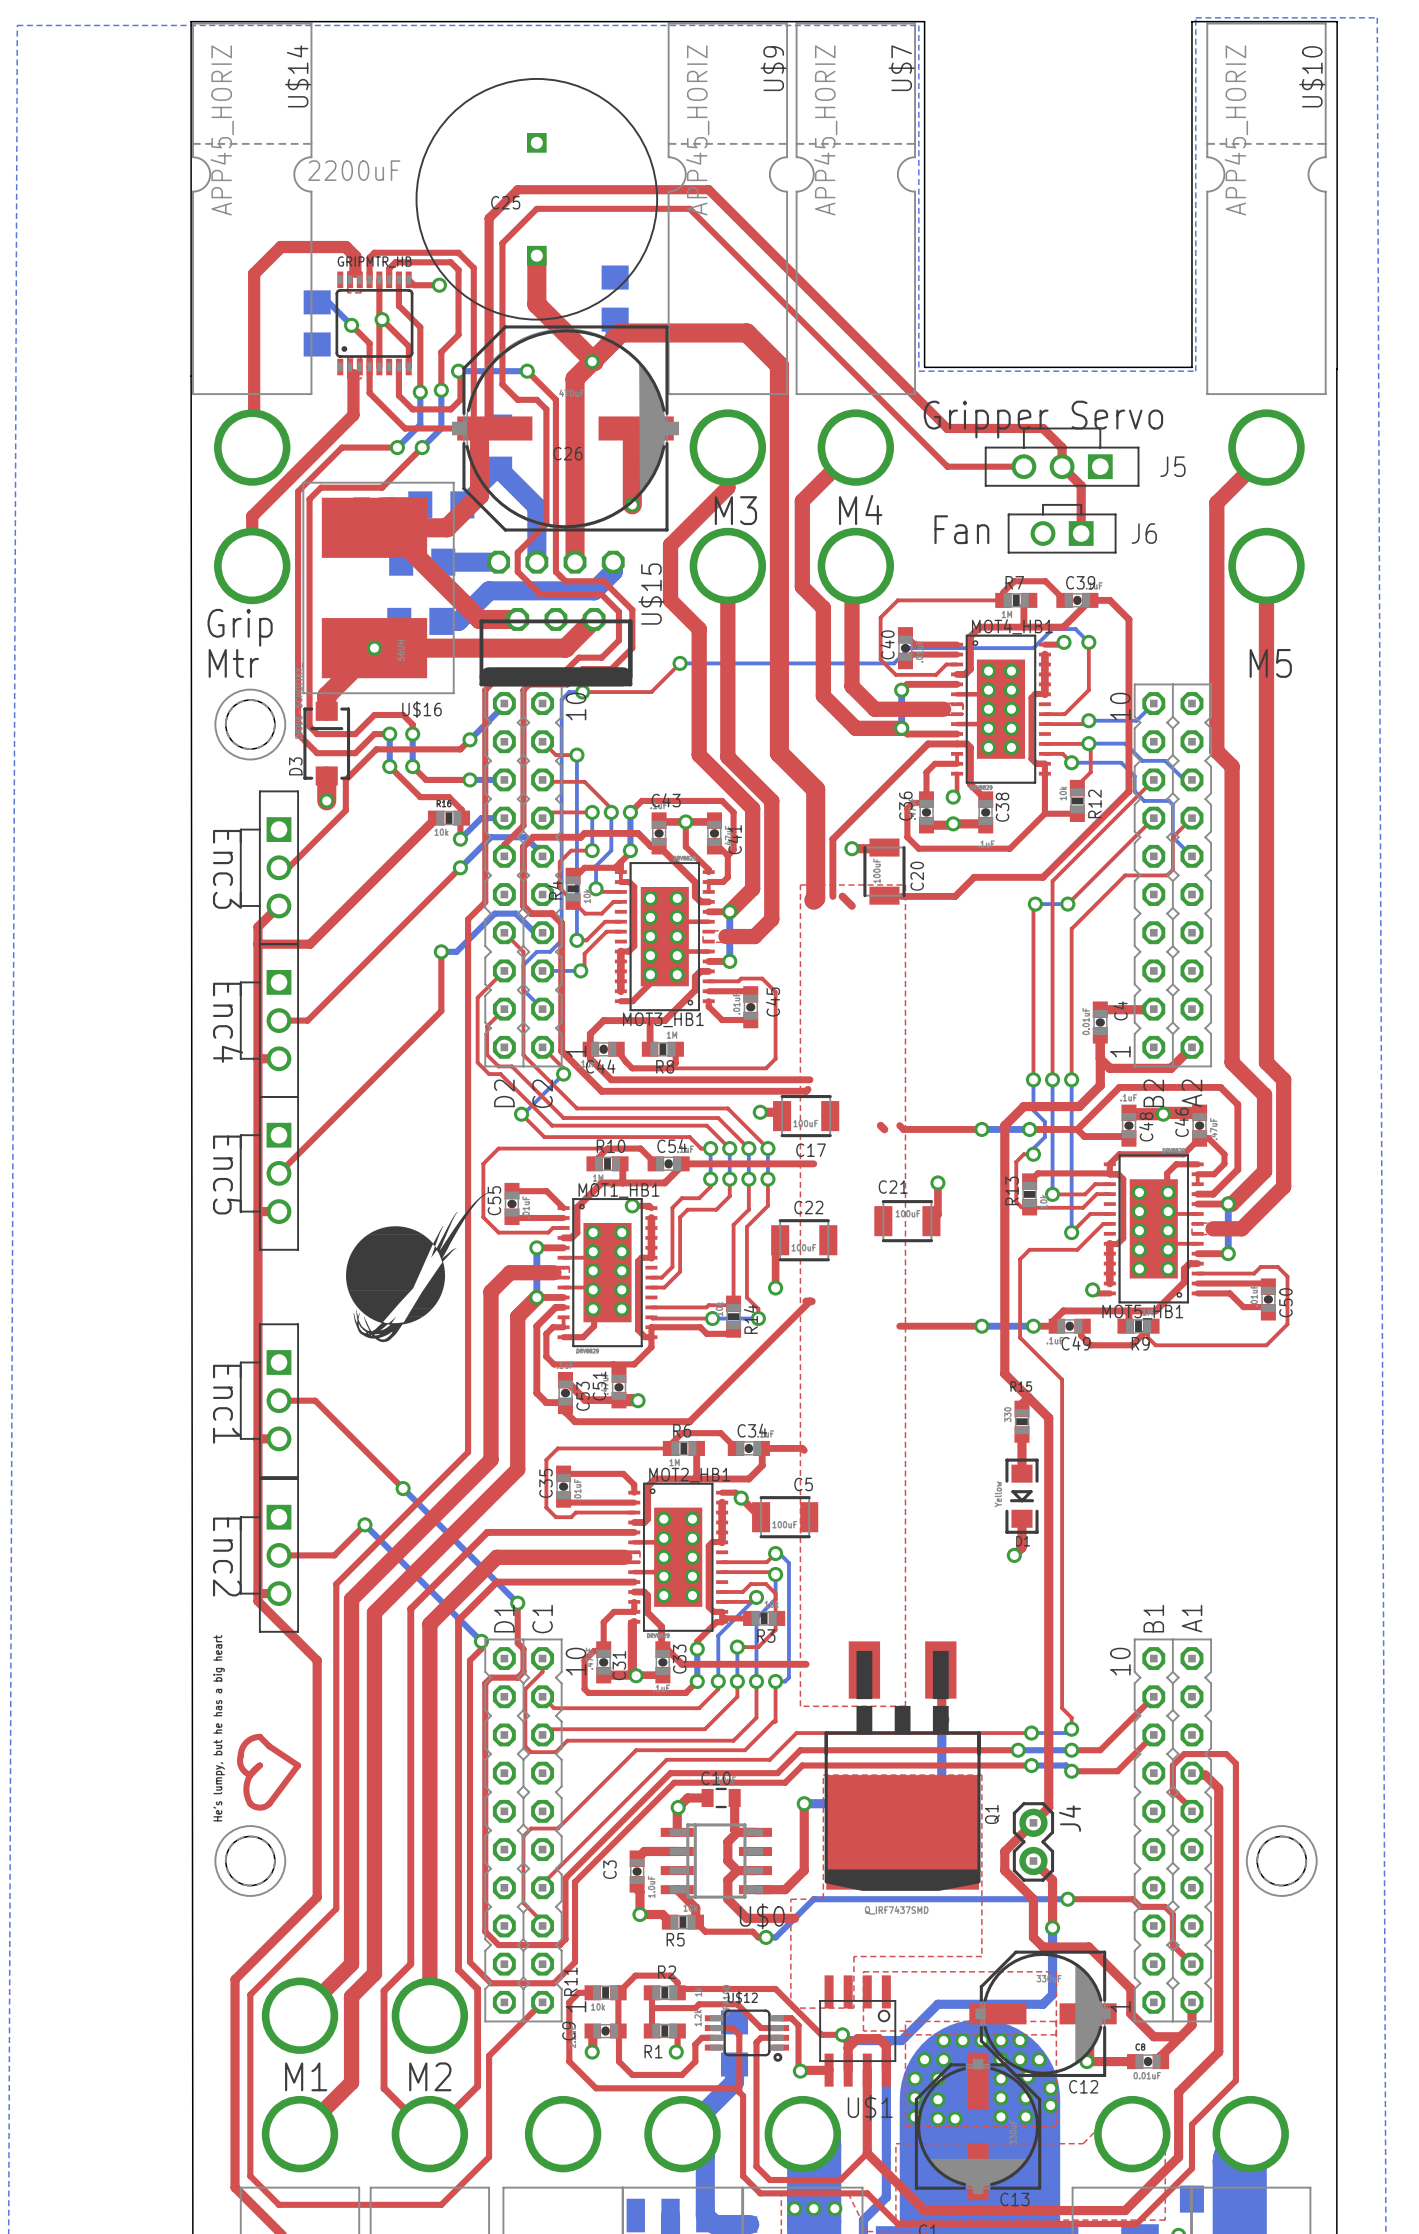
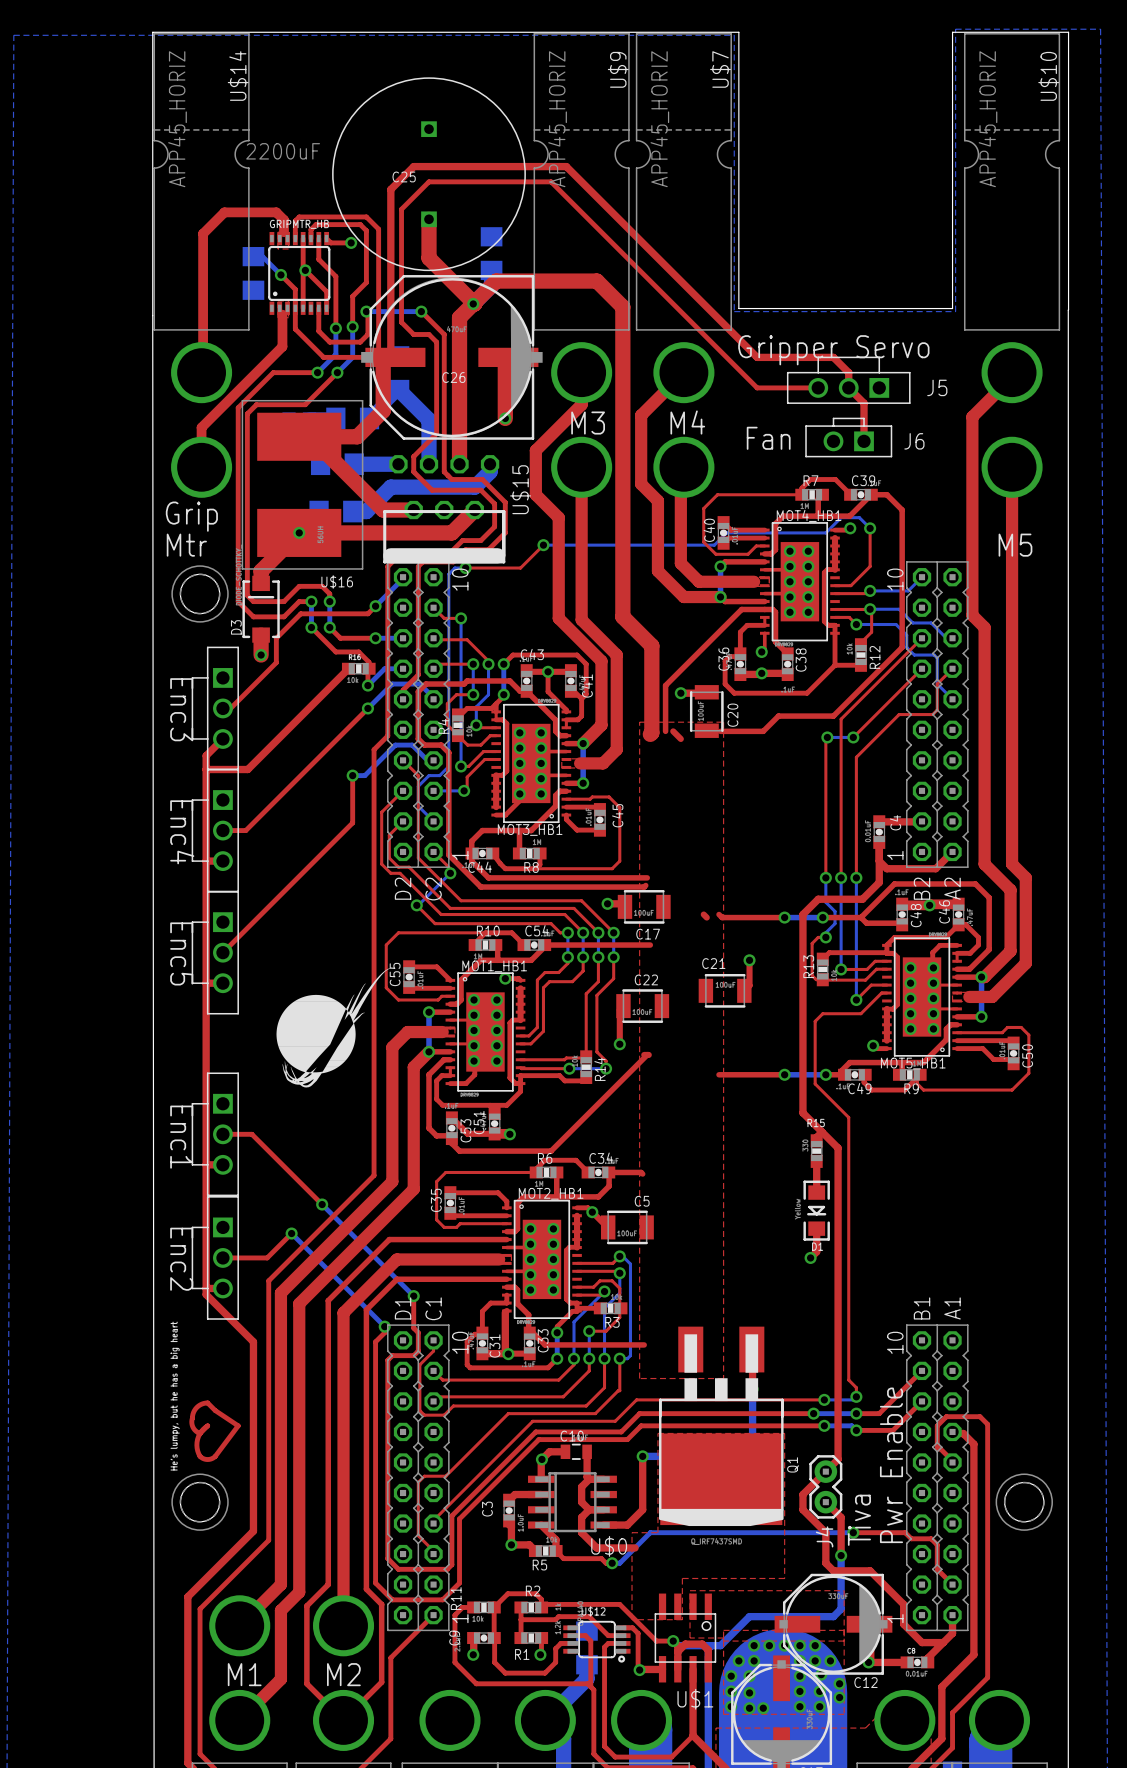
text: none -> Pwr Enable (891, 1465)
J4 name position: J4 (1070, 1818) -> J4 (824, 1536)
text: none -> Tiva (859, 1520)

